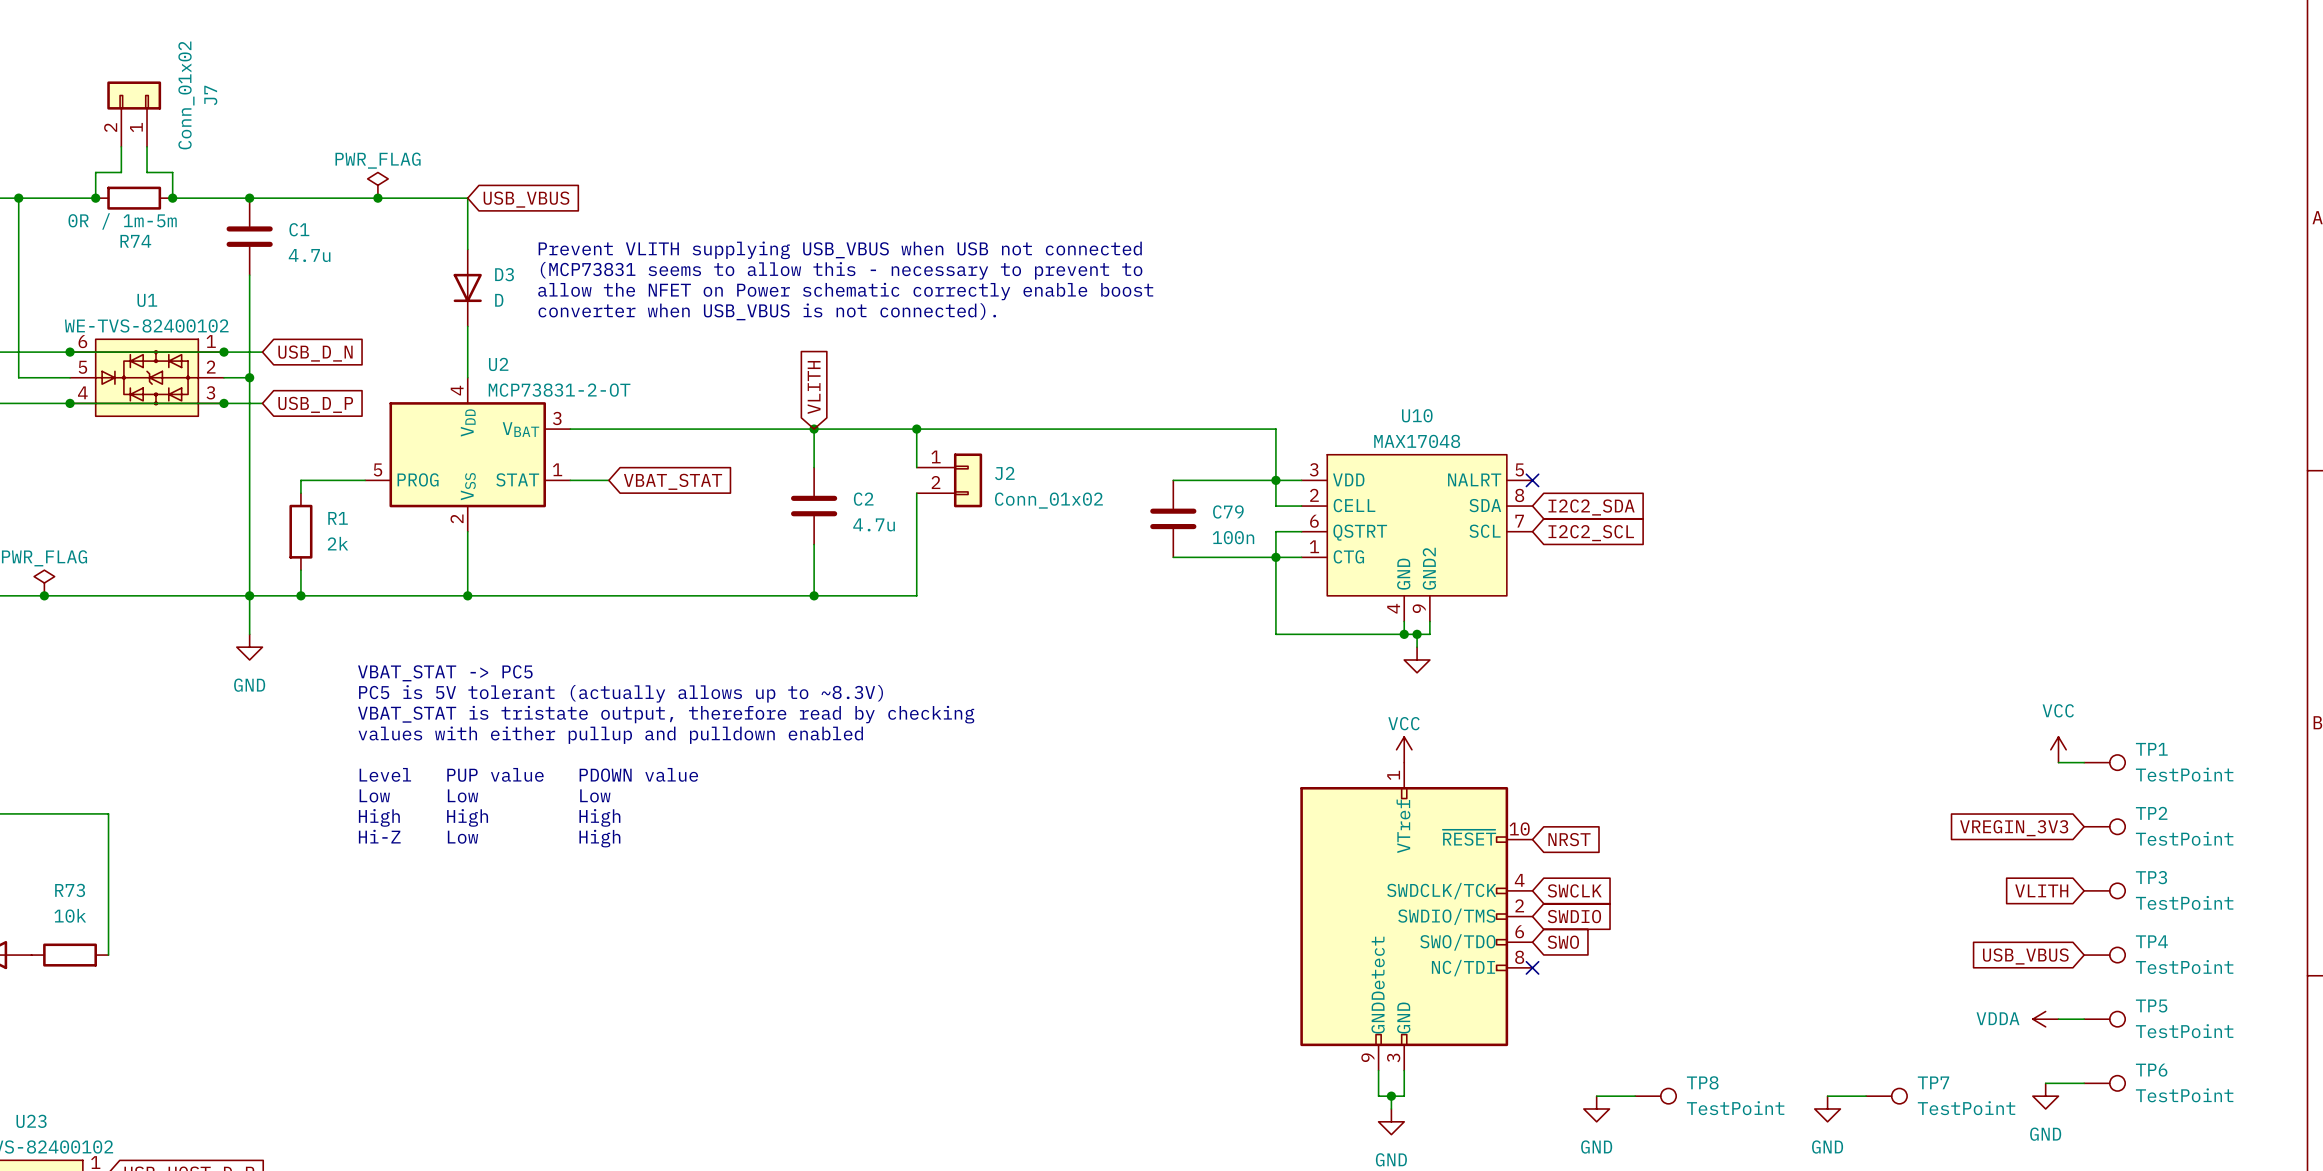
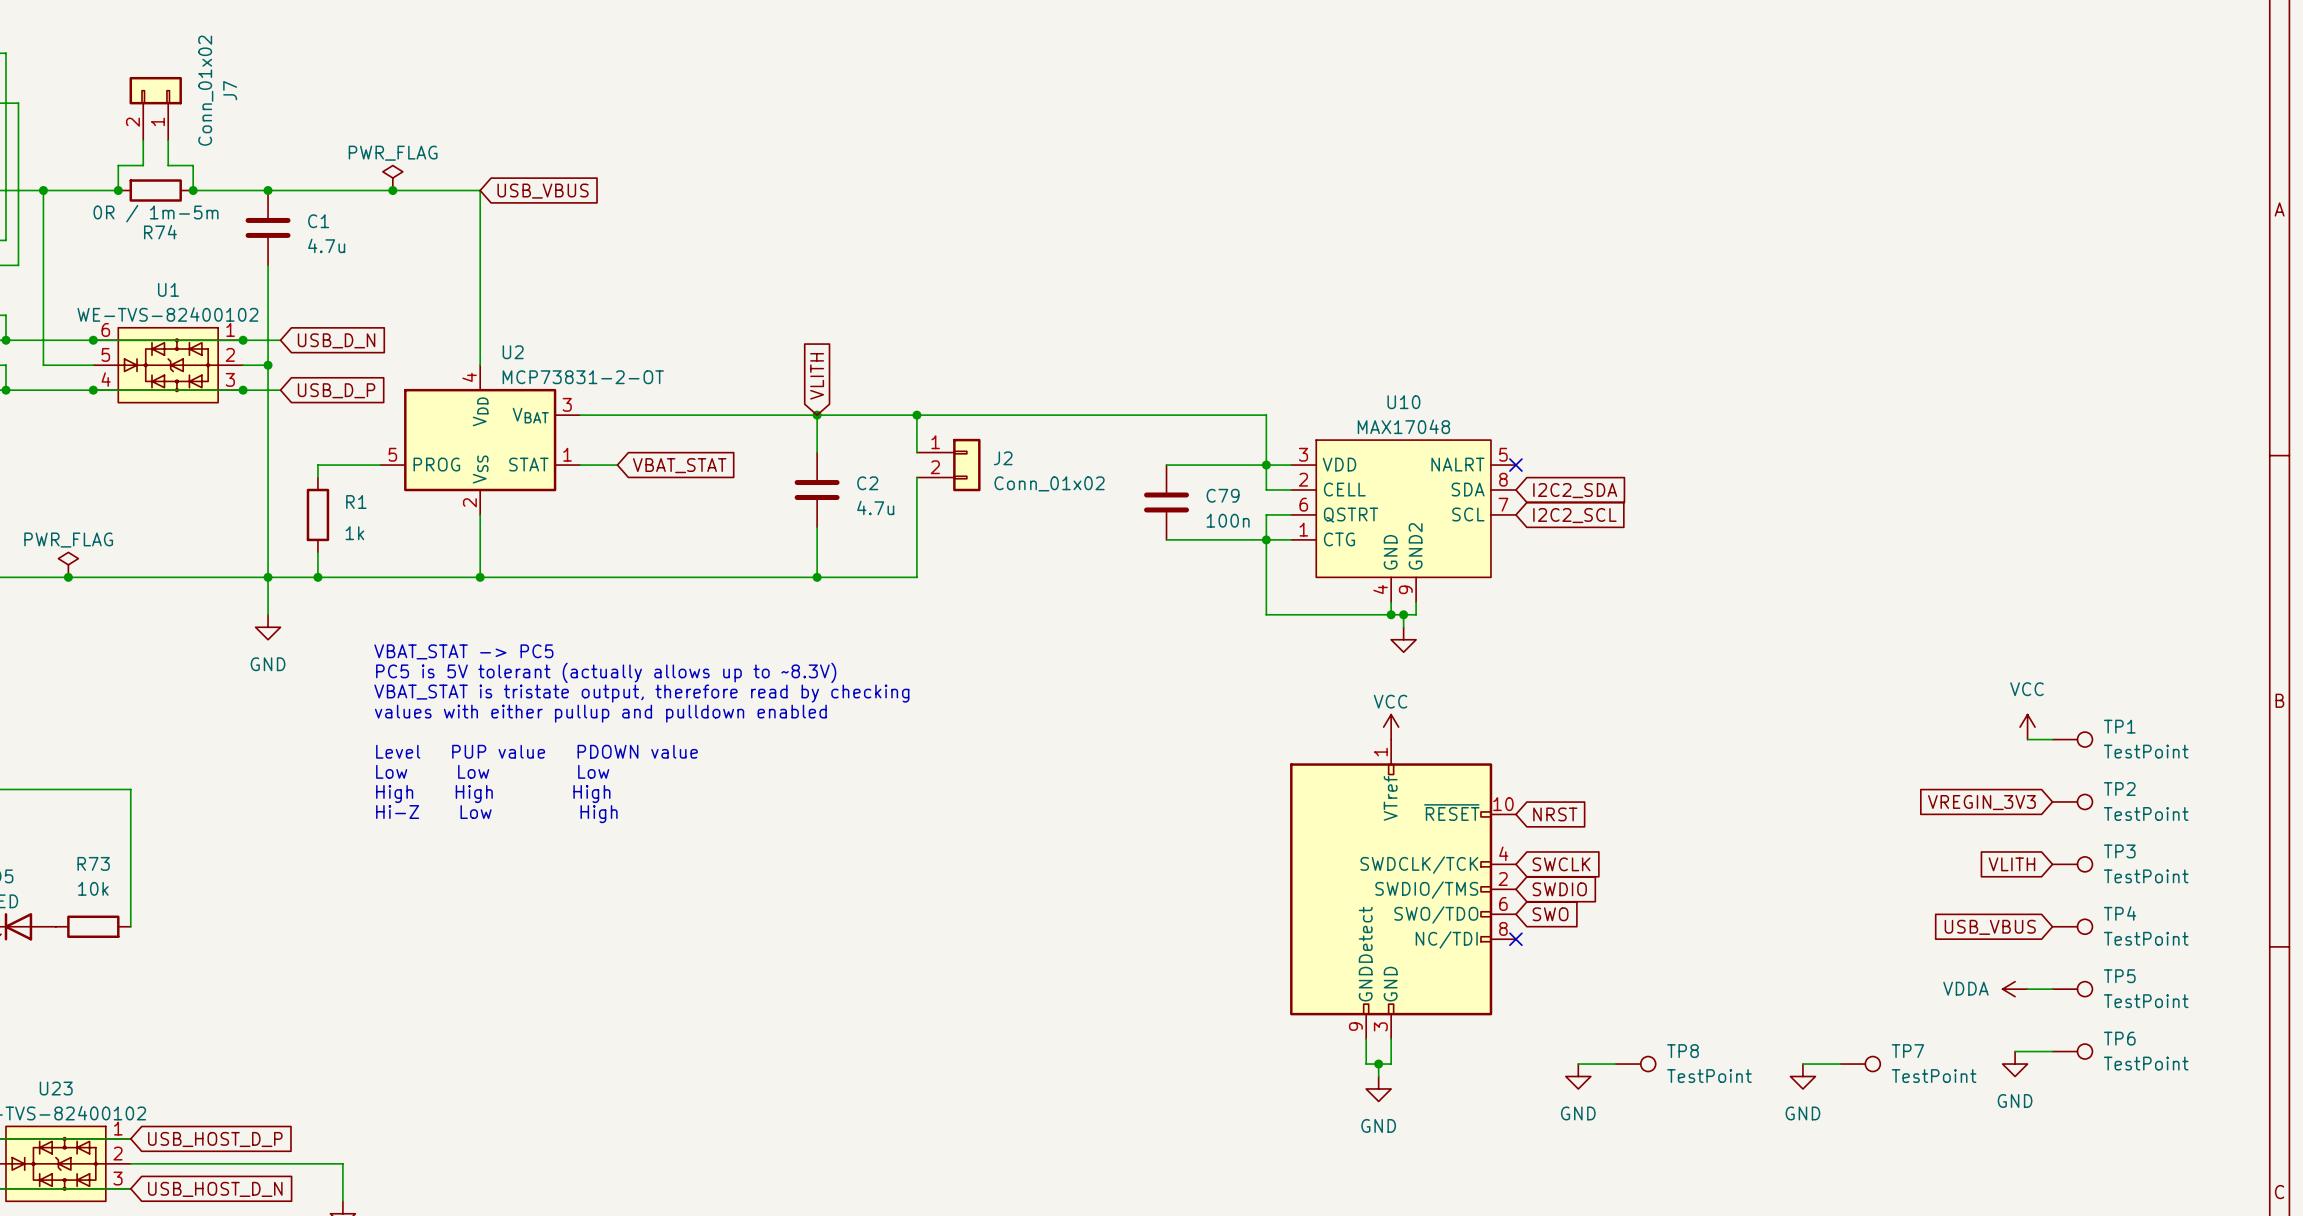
text: Prevent VLITH supplying USB_VBUS when USB not connected (840, 250) -> none
text: (MCP73831 seems to allow this - necessary to prevent to (841, 270) -> none
D3: D (467, 287) -> none
text: allow the NFET on Power schematic correctly enable boost (845, 291) -> none
text: converter when USB_VBUS is not connected). (767, 311) -> none
R1 value: 2k (338, 543) -> 1k (354, 533)

